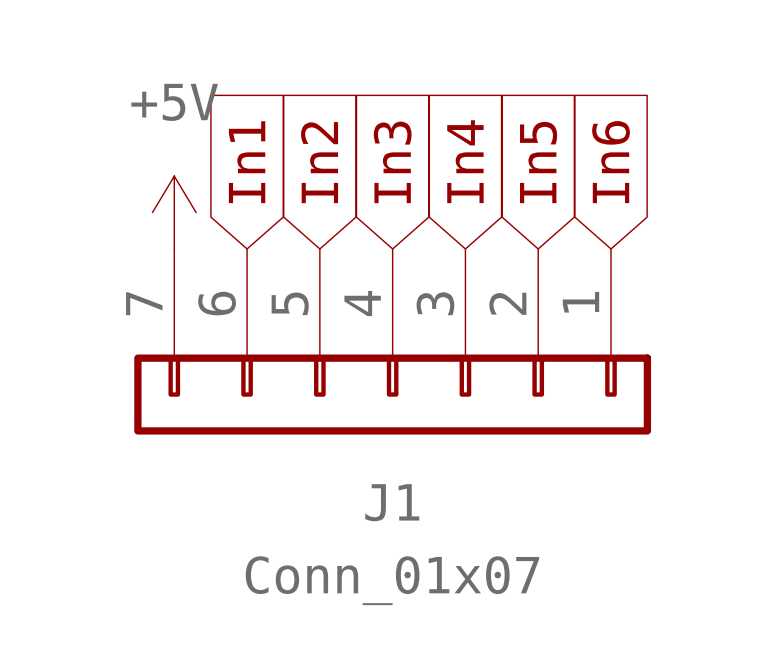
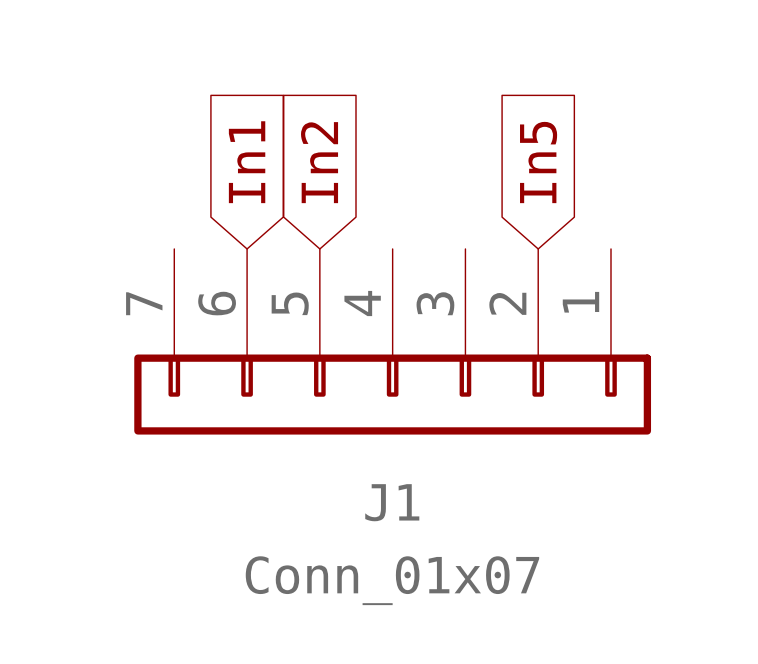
global label: In4 (465, 161) -> none
global label: In3 (392, 162) -> none
global label: In6 (611, 162) -> none
power symbol: +5V (174, 212) -> none

